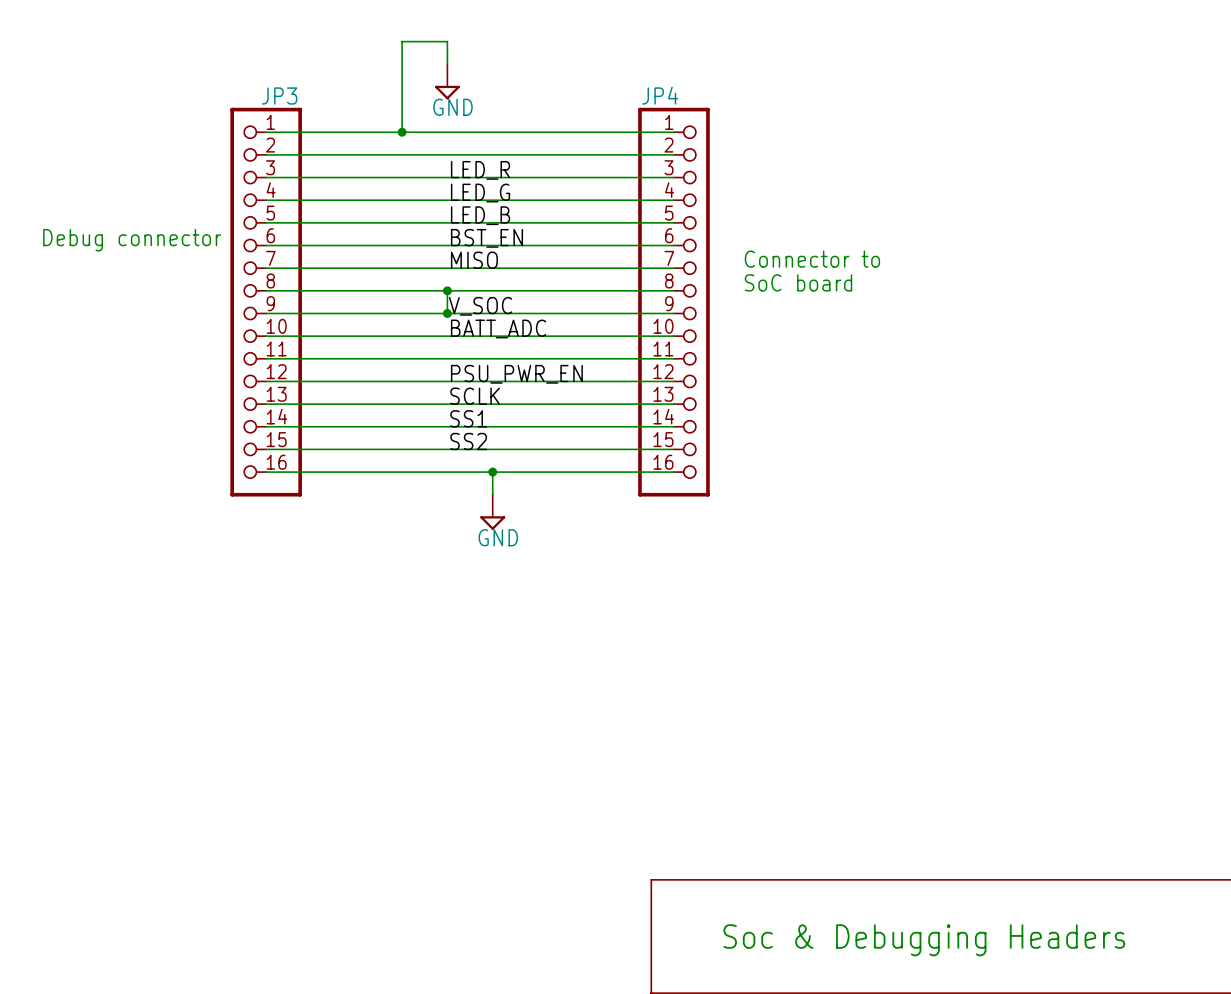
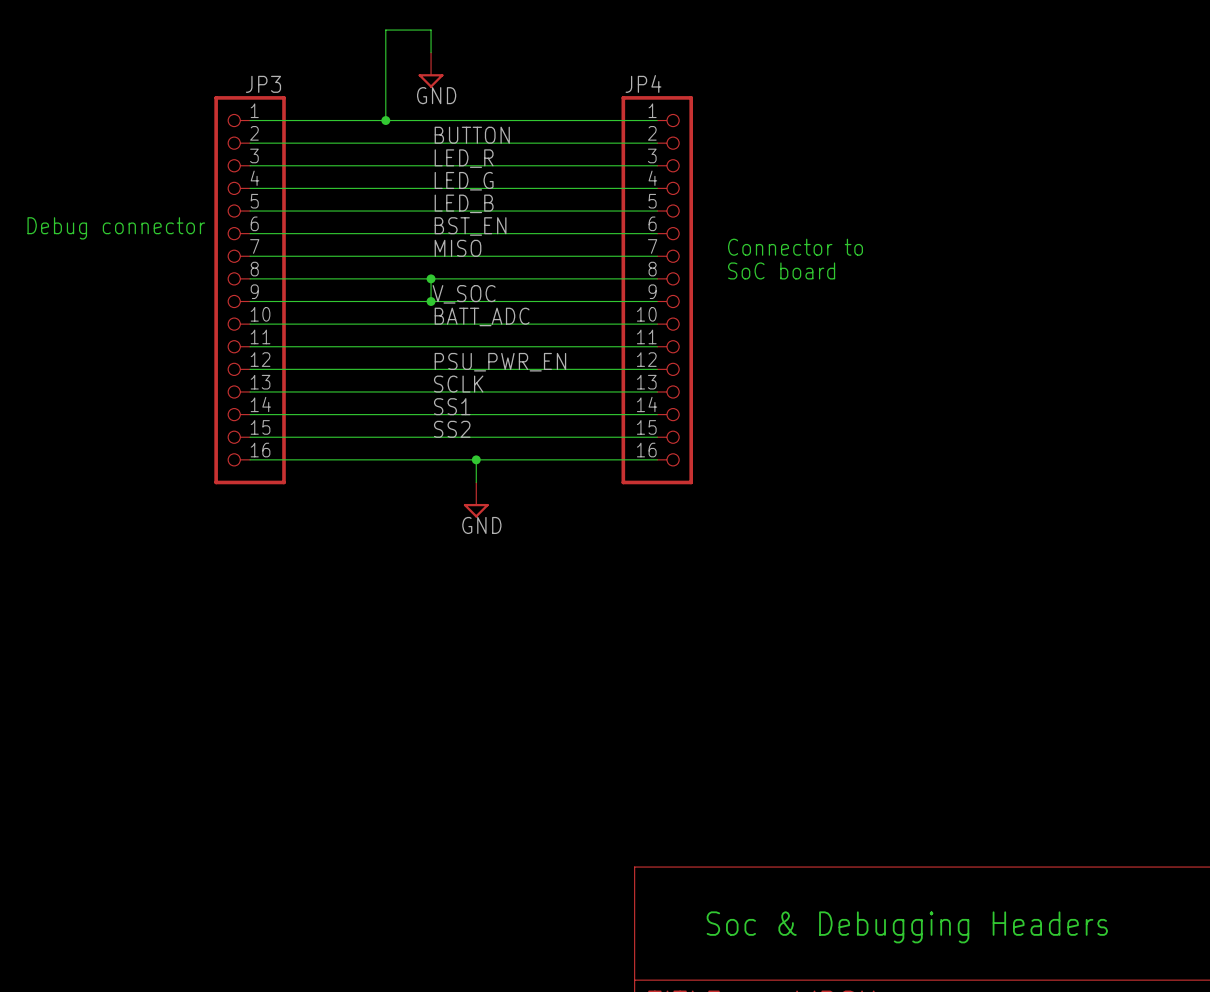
label: none -> BUTTON (472, 135)

